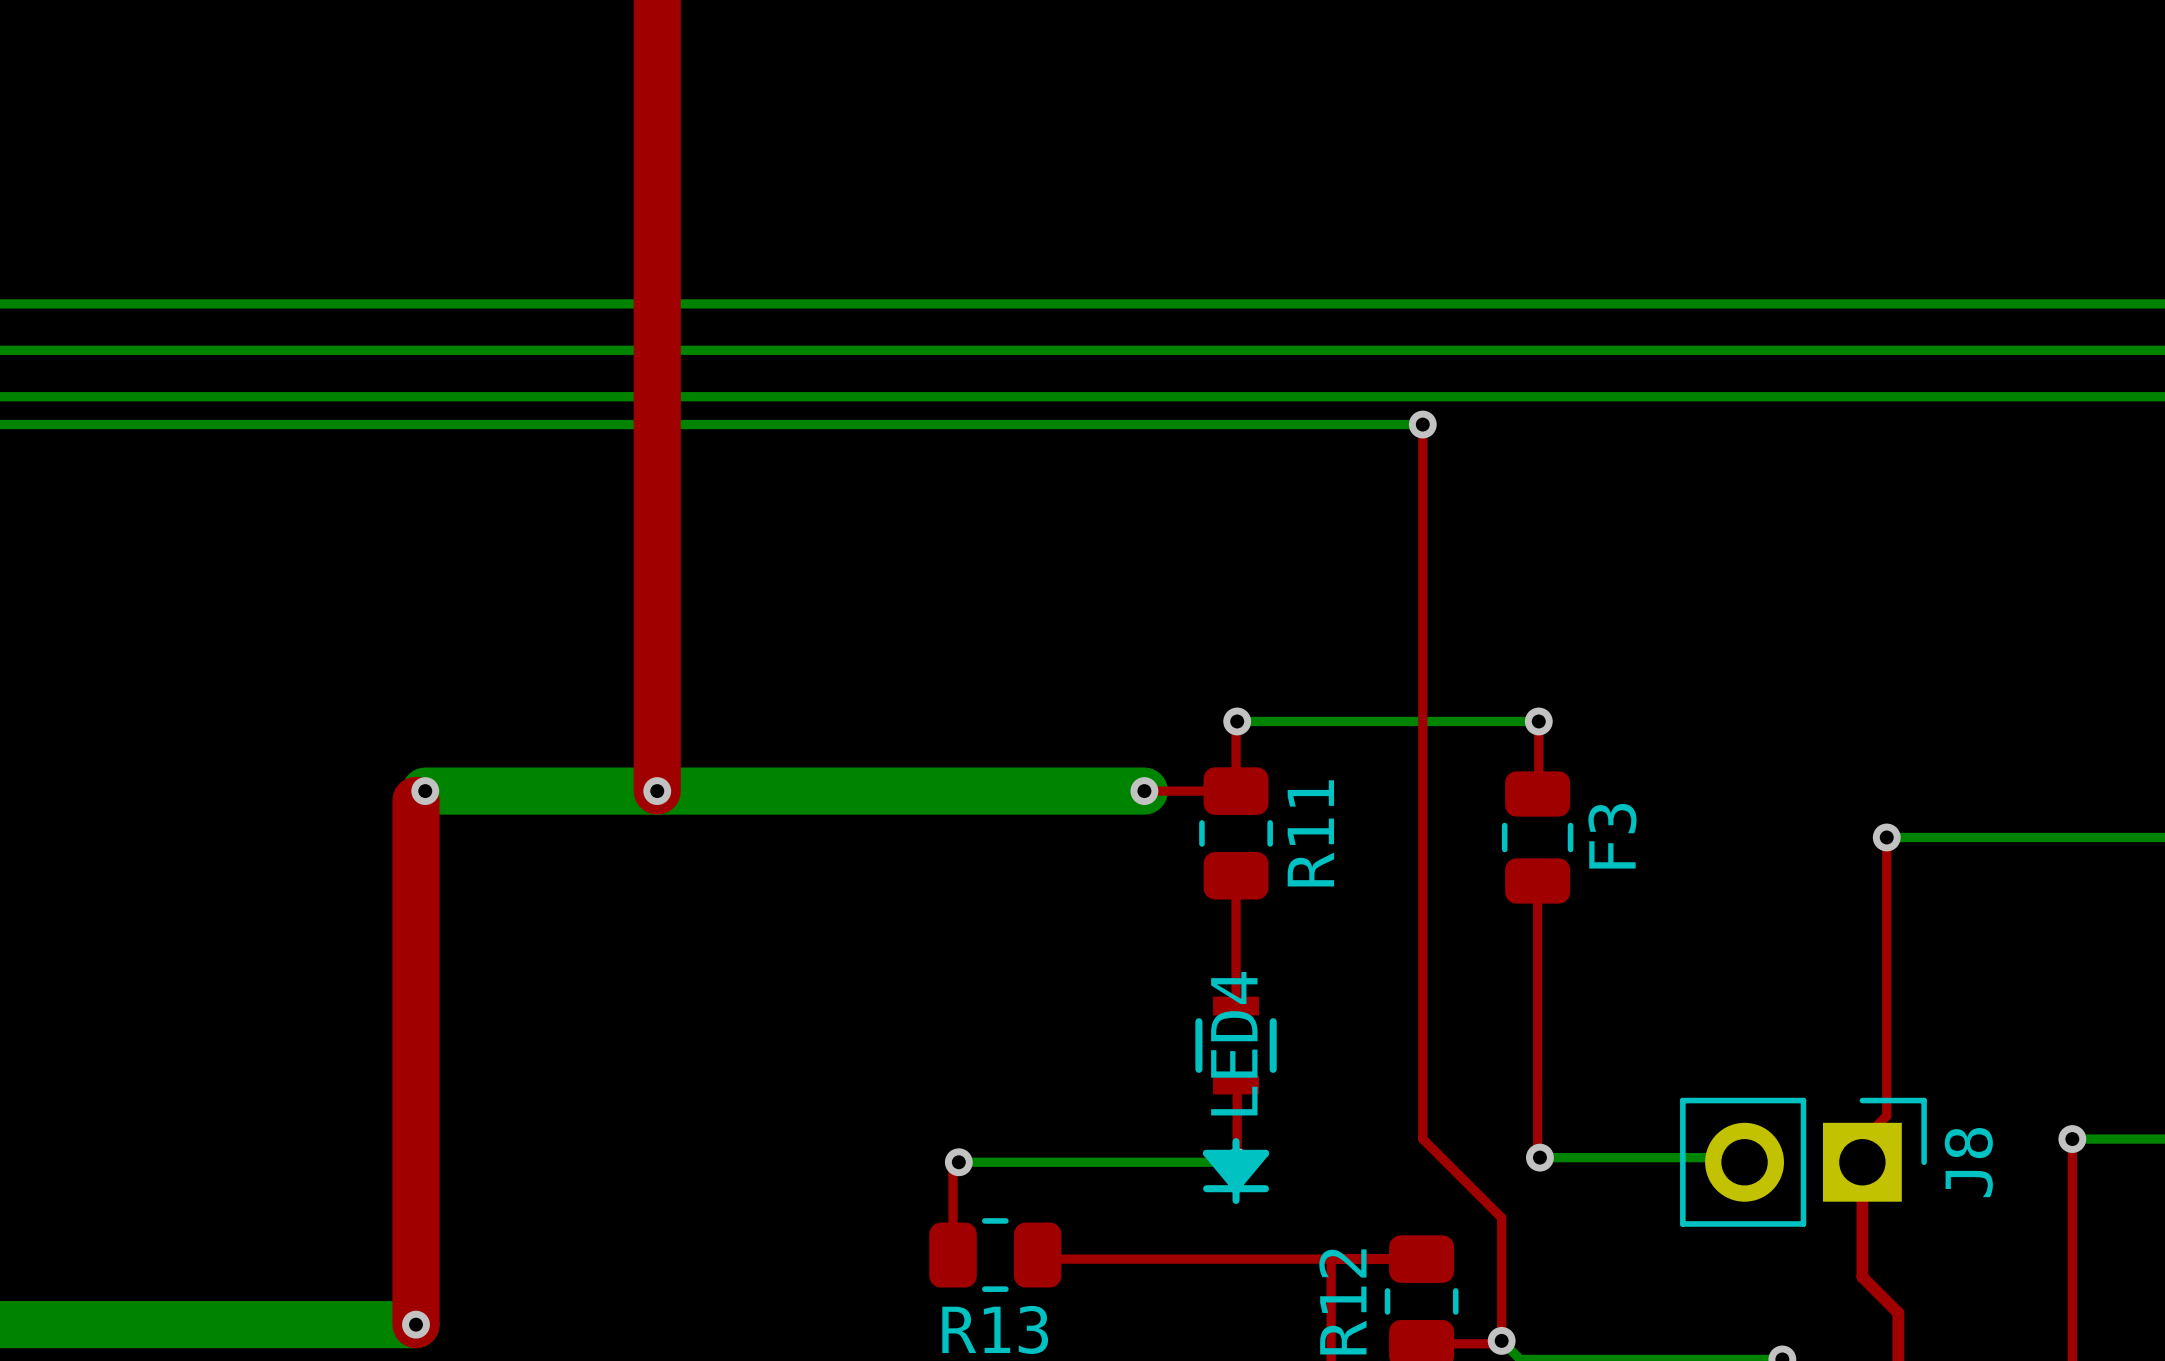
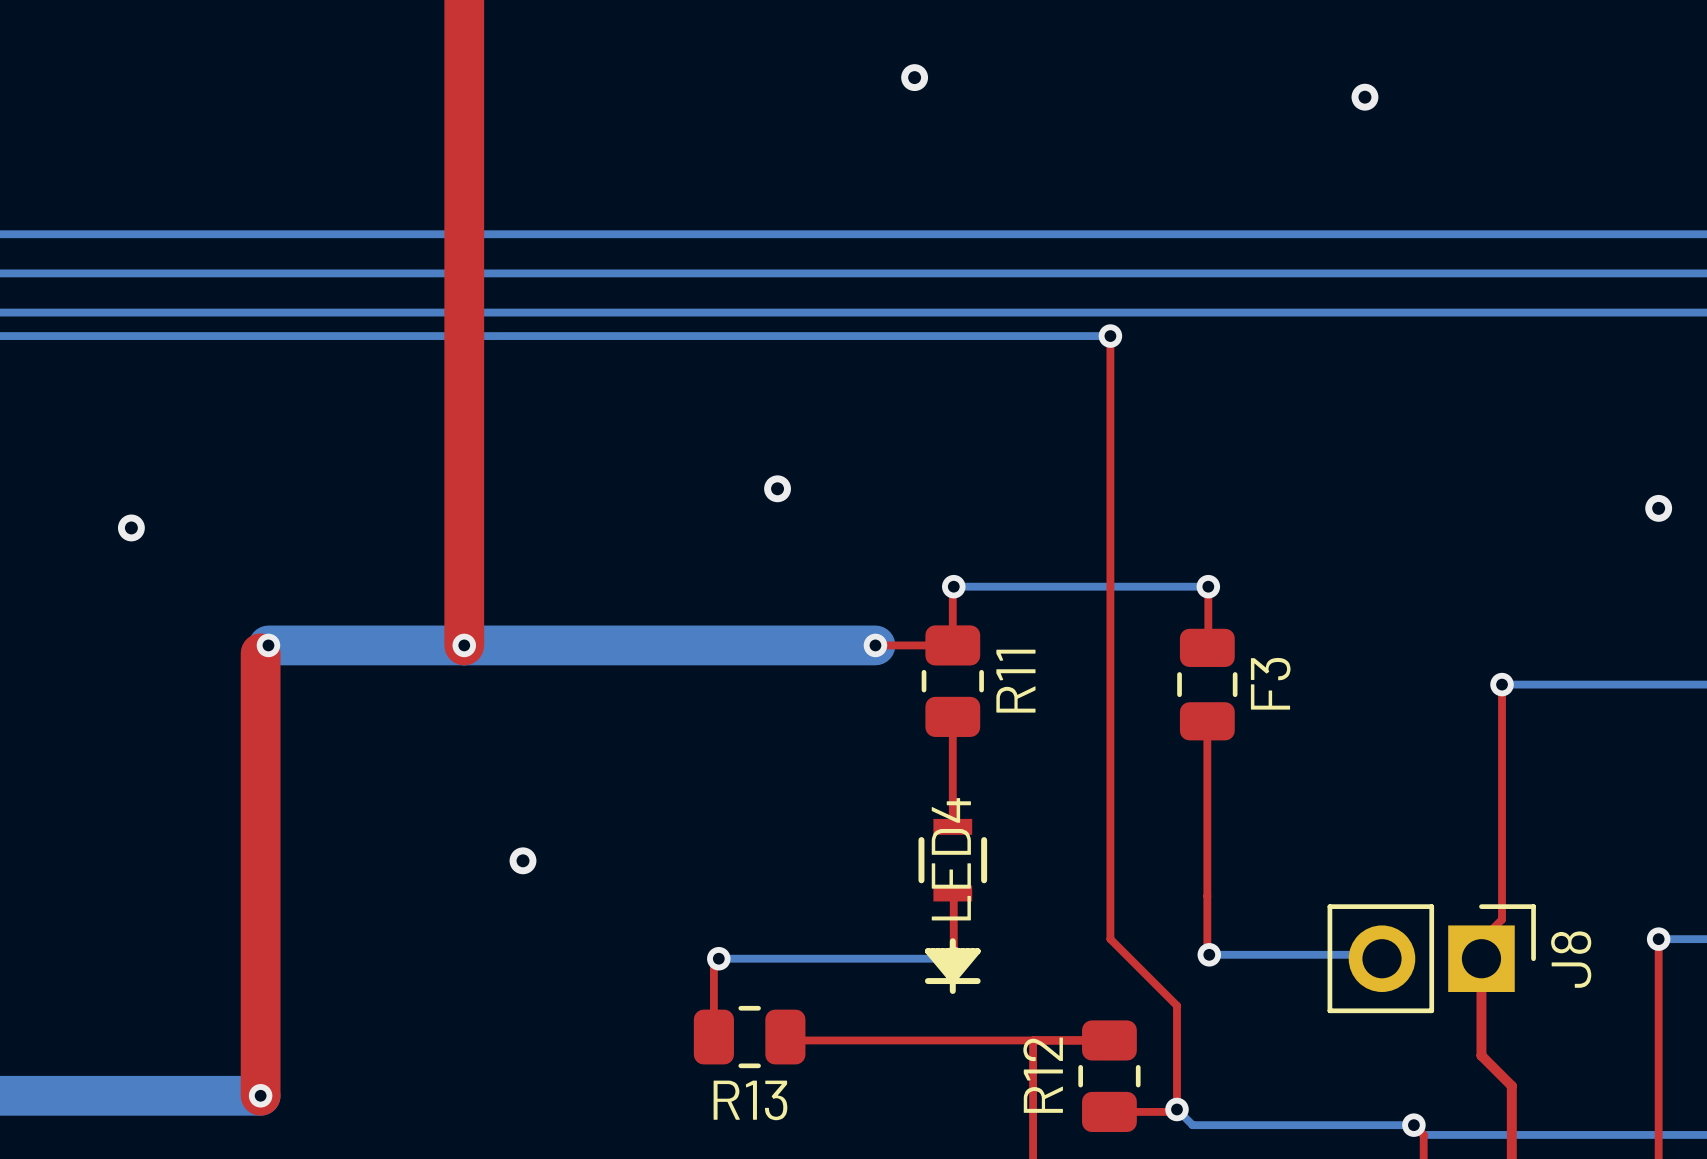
via: none -> (914, 77)
via: none -> (1364, 97)
via: none -> (777, 488)
via: none -> (1658, 508)
via: none -> (131, 527)
via: none -> (523, 860)

